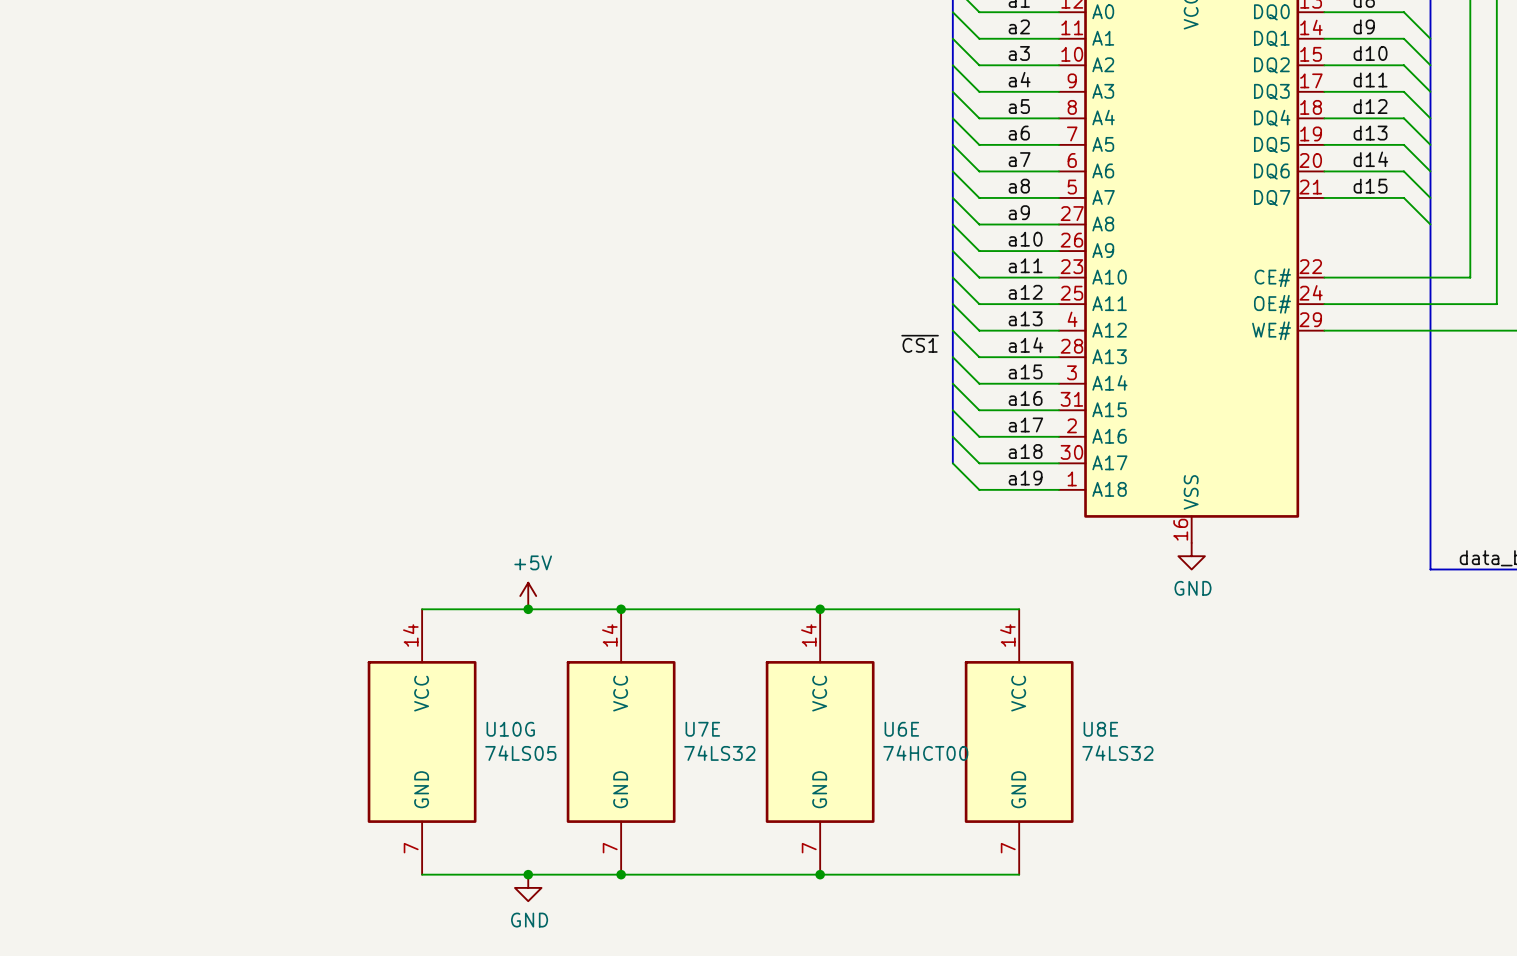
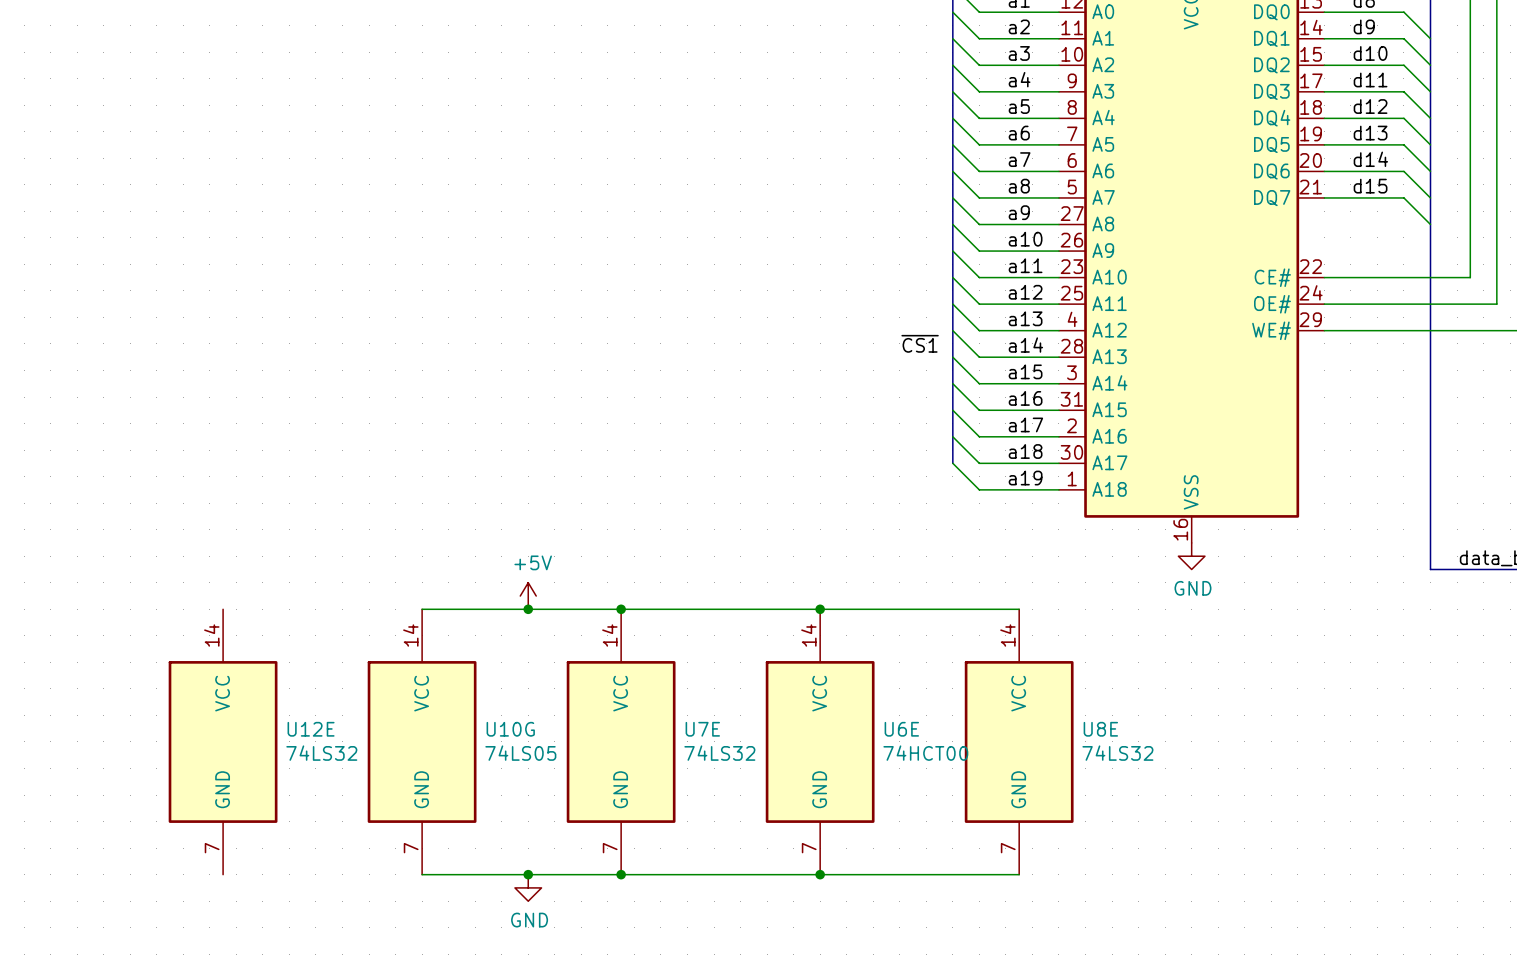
U12E: none -> 74LS32 (223, 741)

